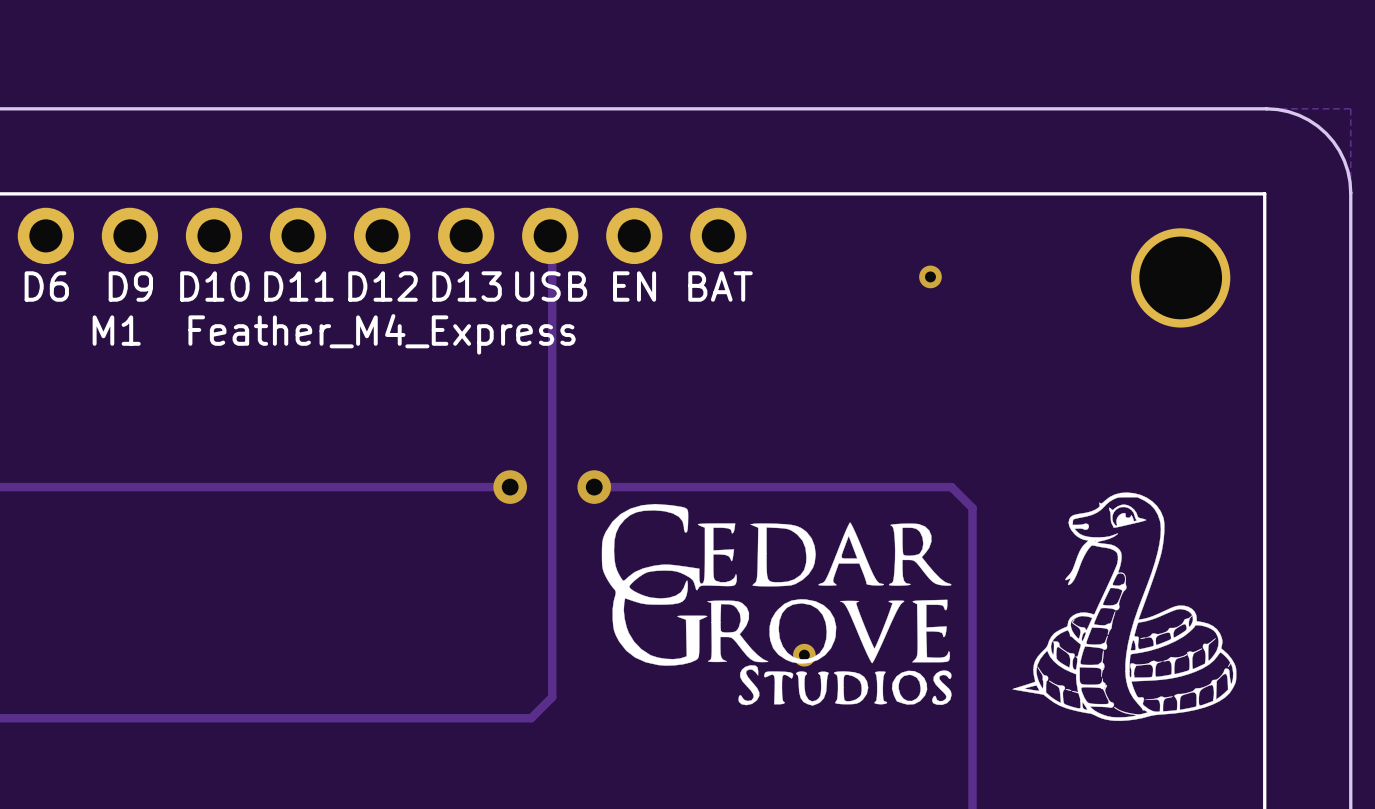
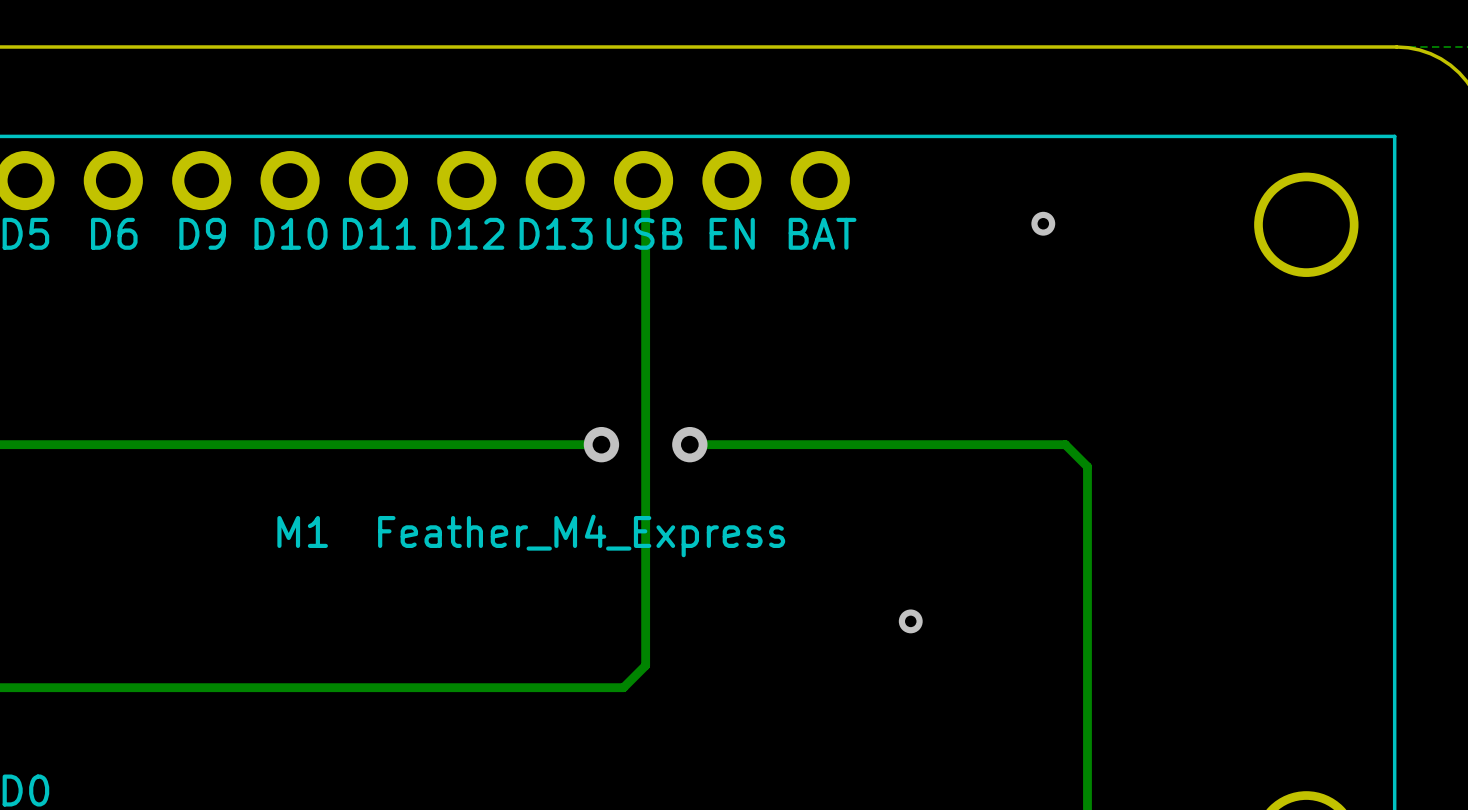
text position: M1 Feather_M4_Express (334, 334) -> M1 Feather_M4_Express (531, 535)
drawing: [1012, 492, 1237, 721] -> none
drawing: [601, 503, 952, 706] -> none

